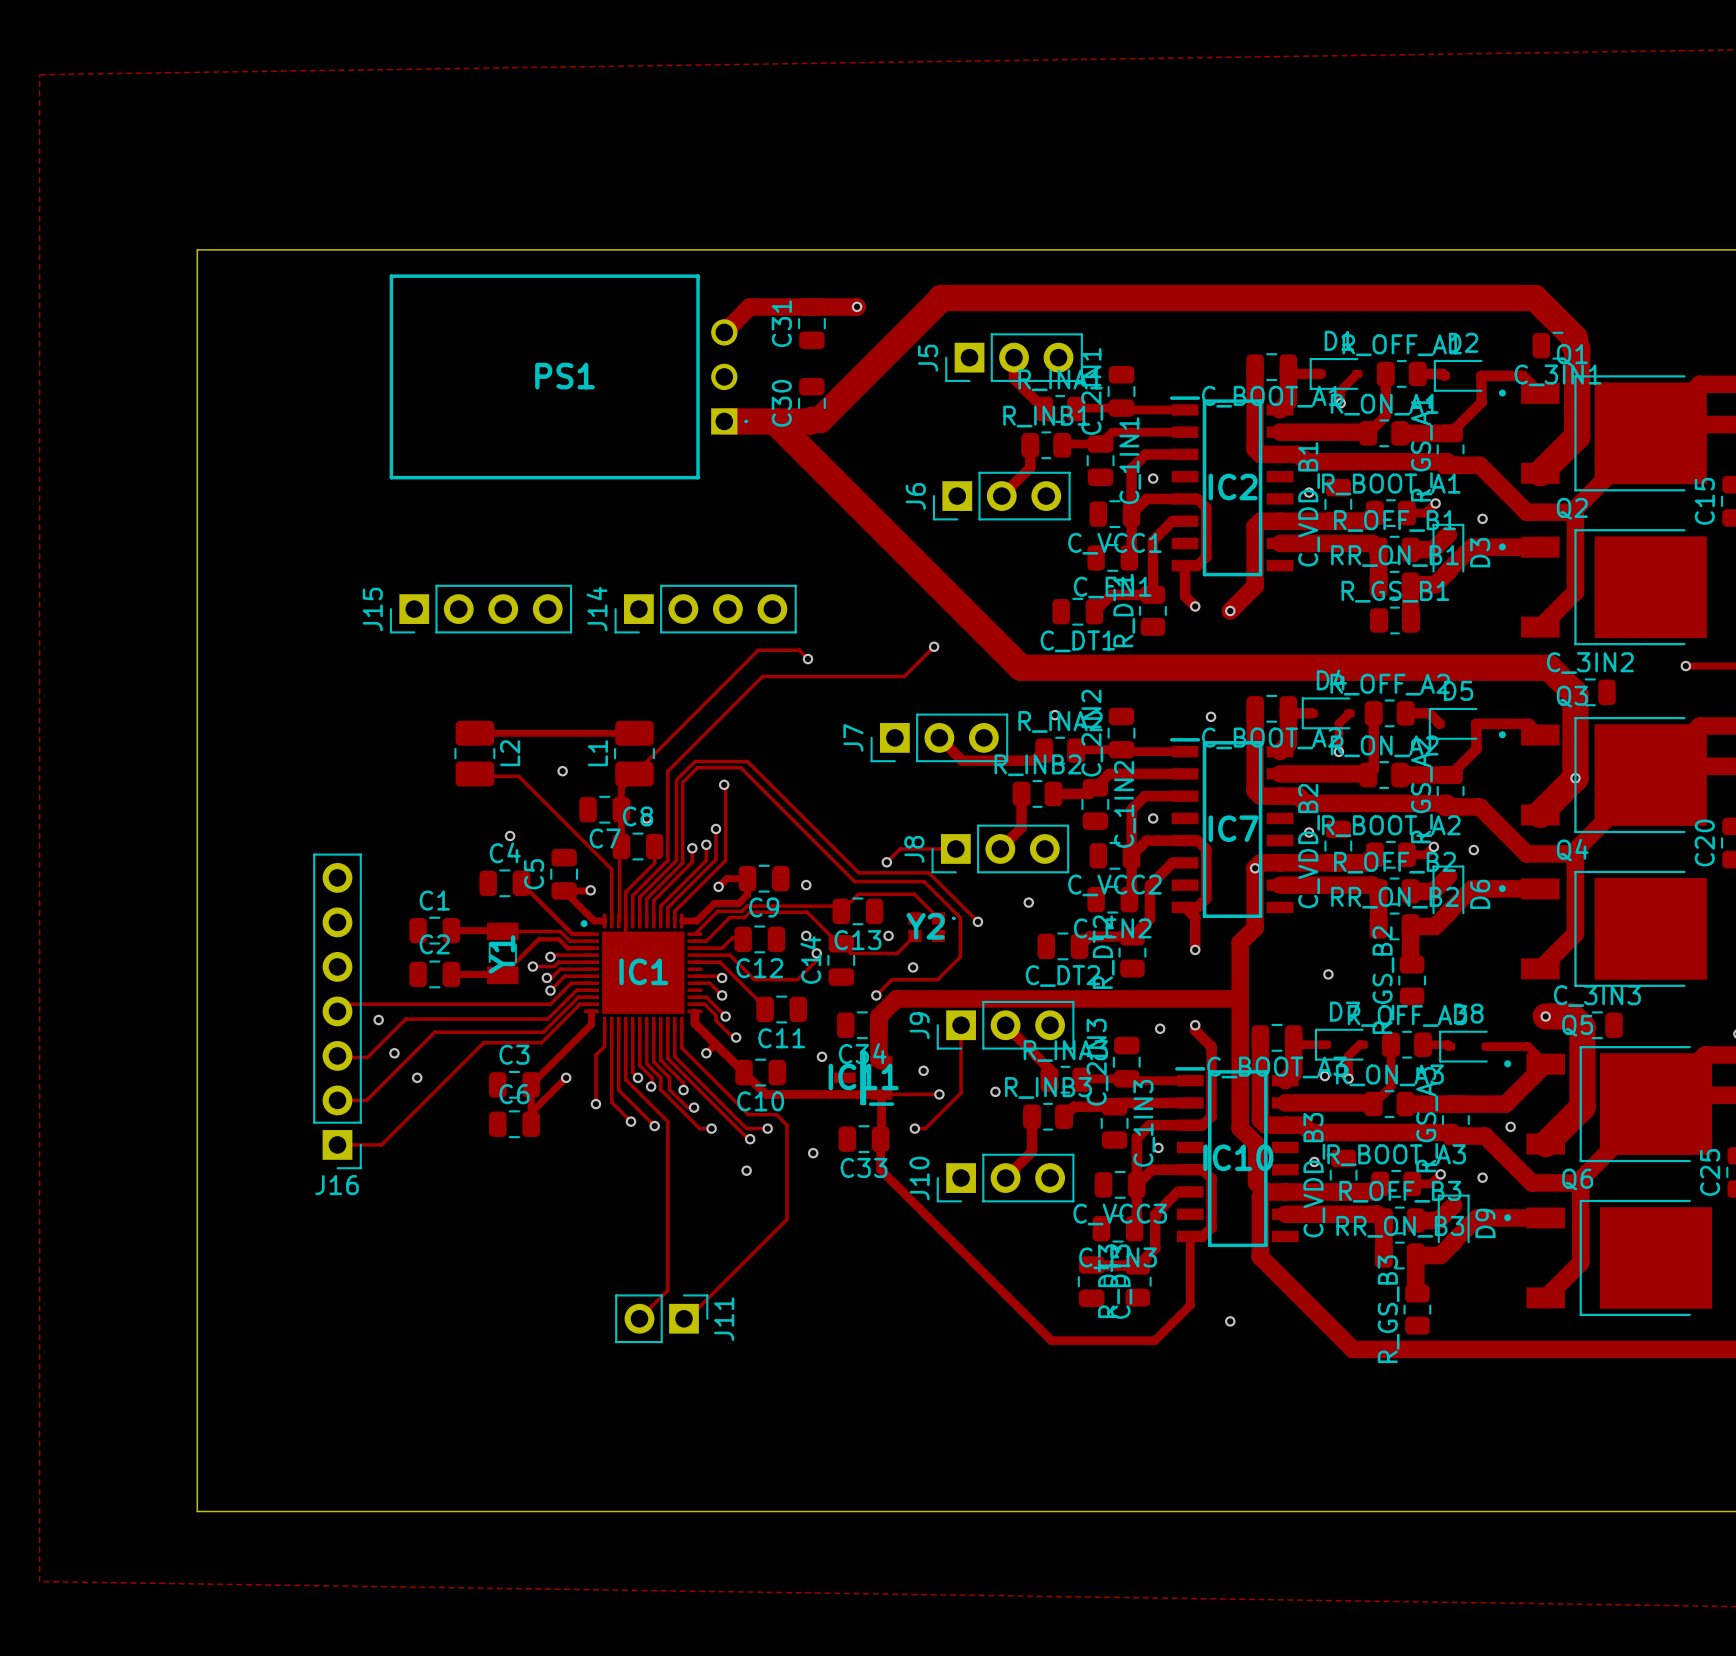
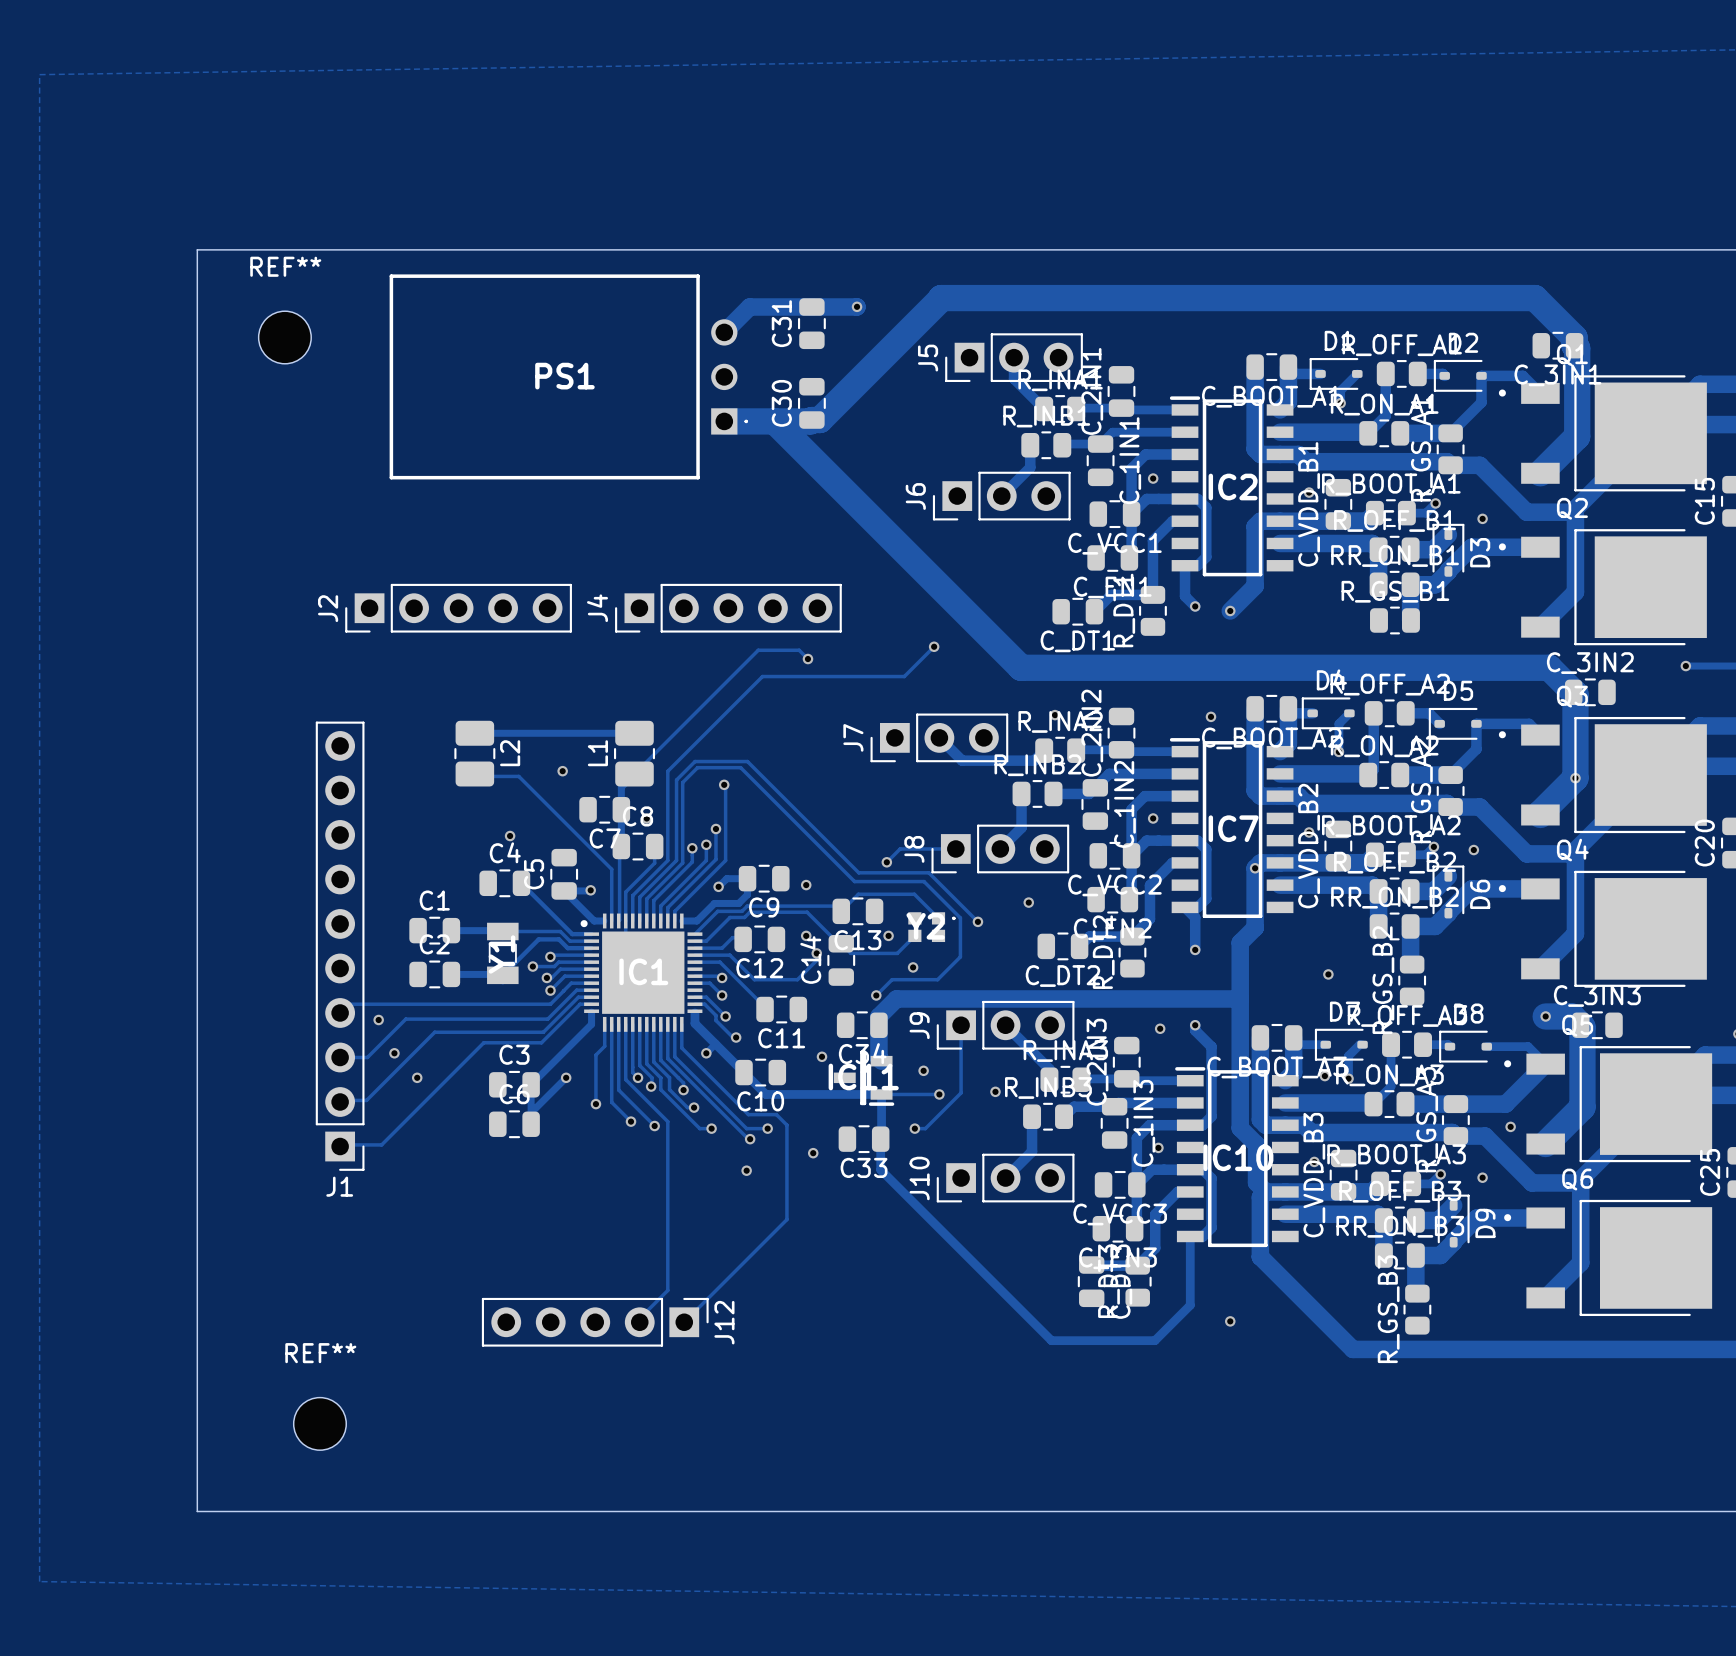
REF**: none -> (284, 337)
J2: none -> (458, 608)
J4: none -> (728, 608)
J15: (481, 609) -> none
J14: (705, 609) -> none
J1: none -> (340, 946)
J16: (337, 1011) -> none
J11: (661, 1318) -> none
J12: none -> (595, 1322)
REF**: none -> (319, 1423)

